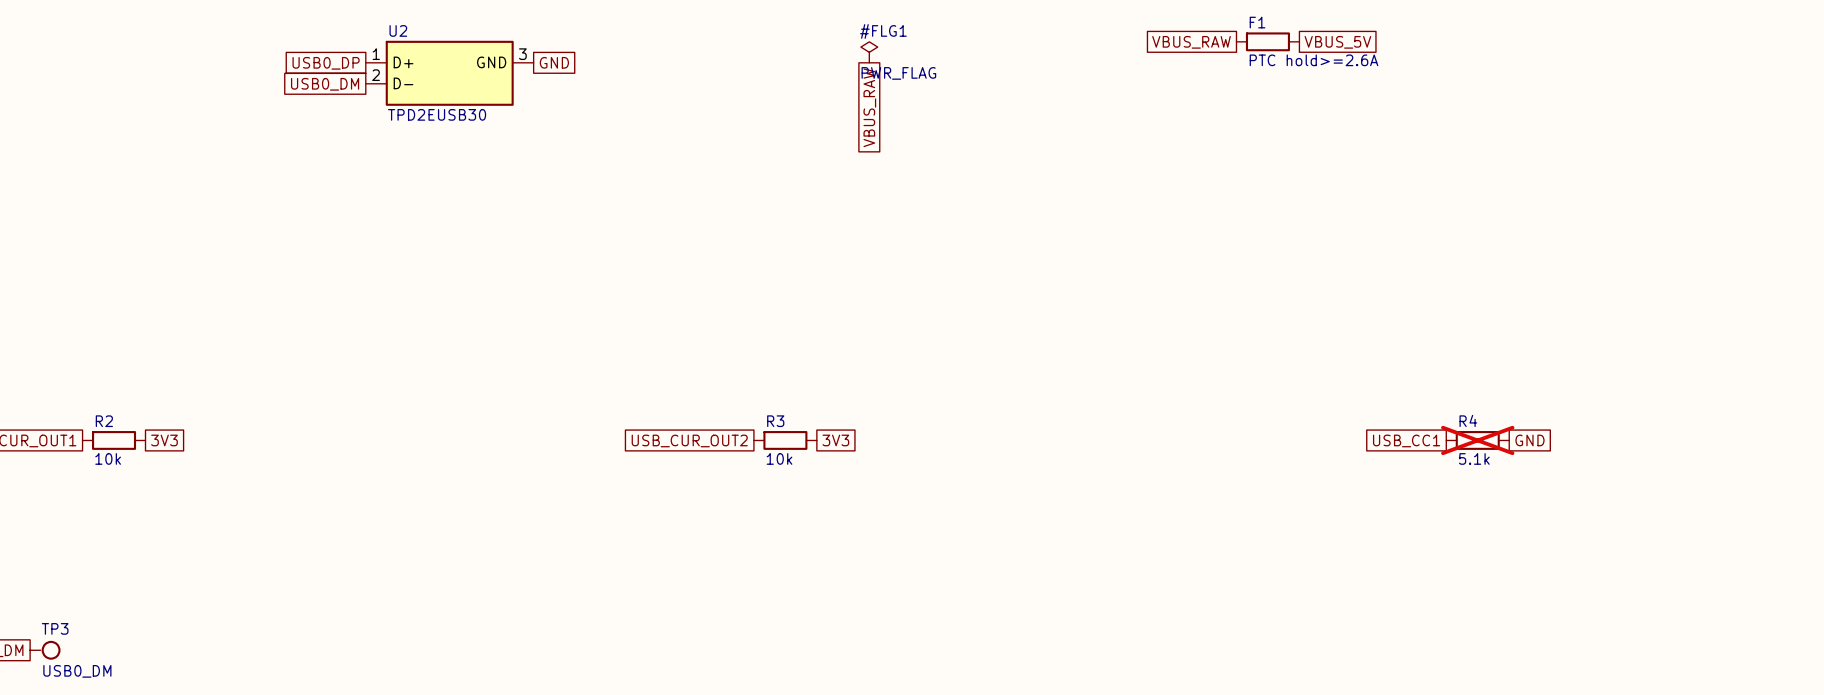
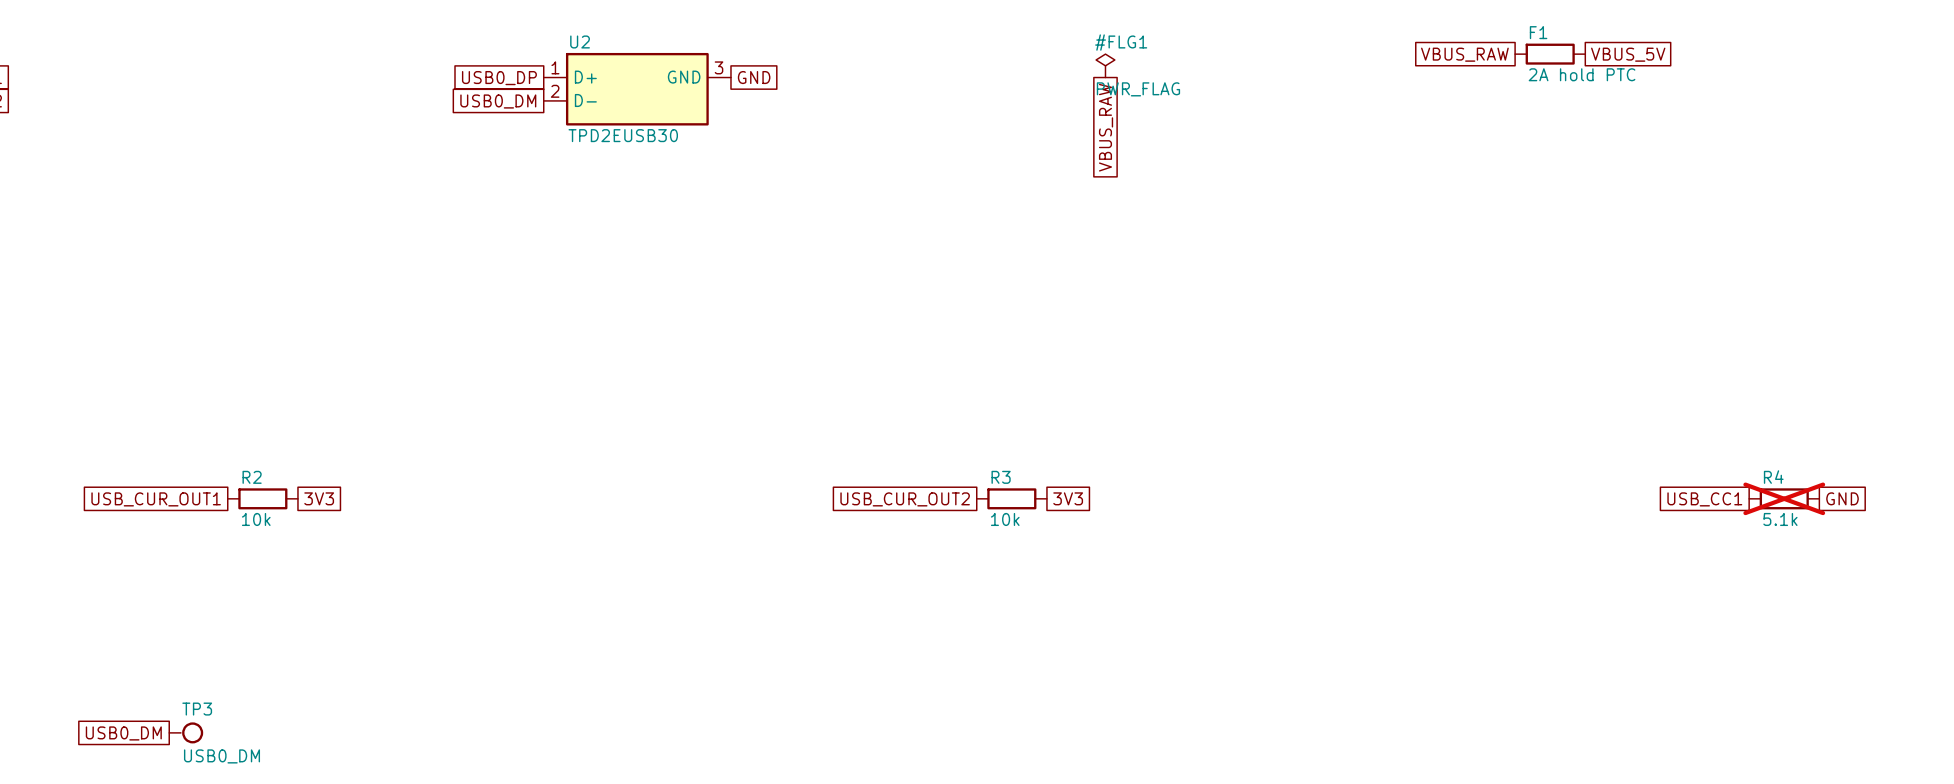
F1 value: PTC hold>=2.6A (1313, 60) -> 2A hold PTC (1582, 74)

